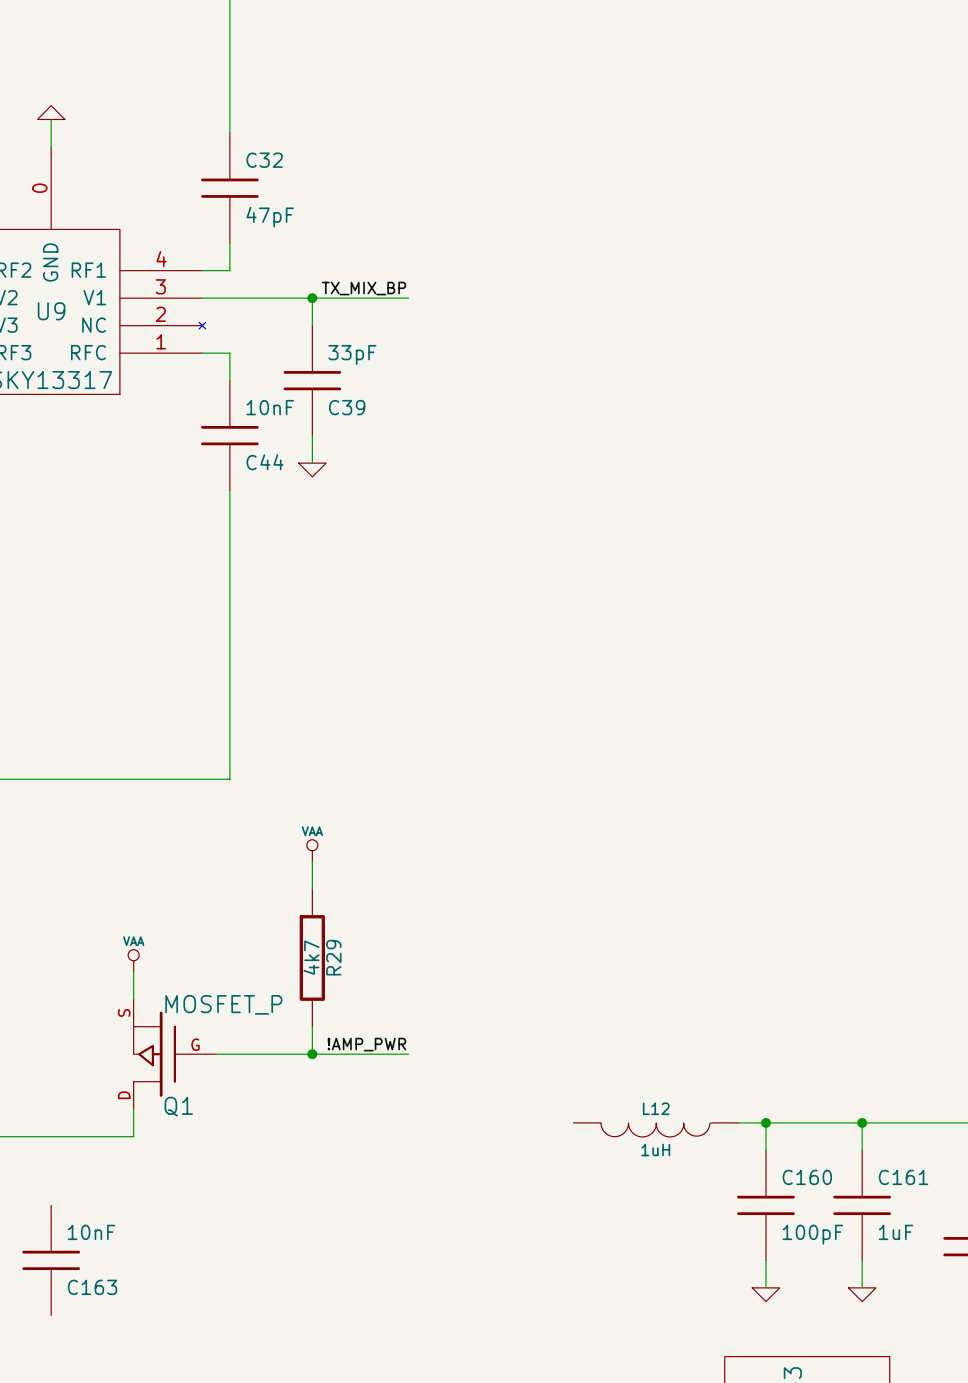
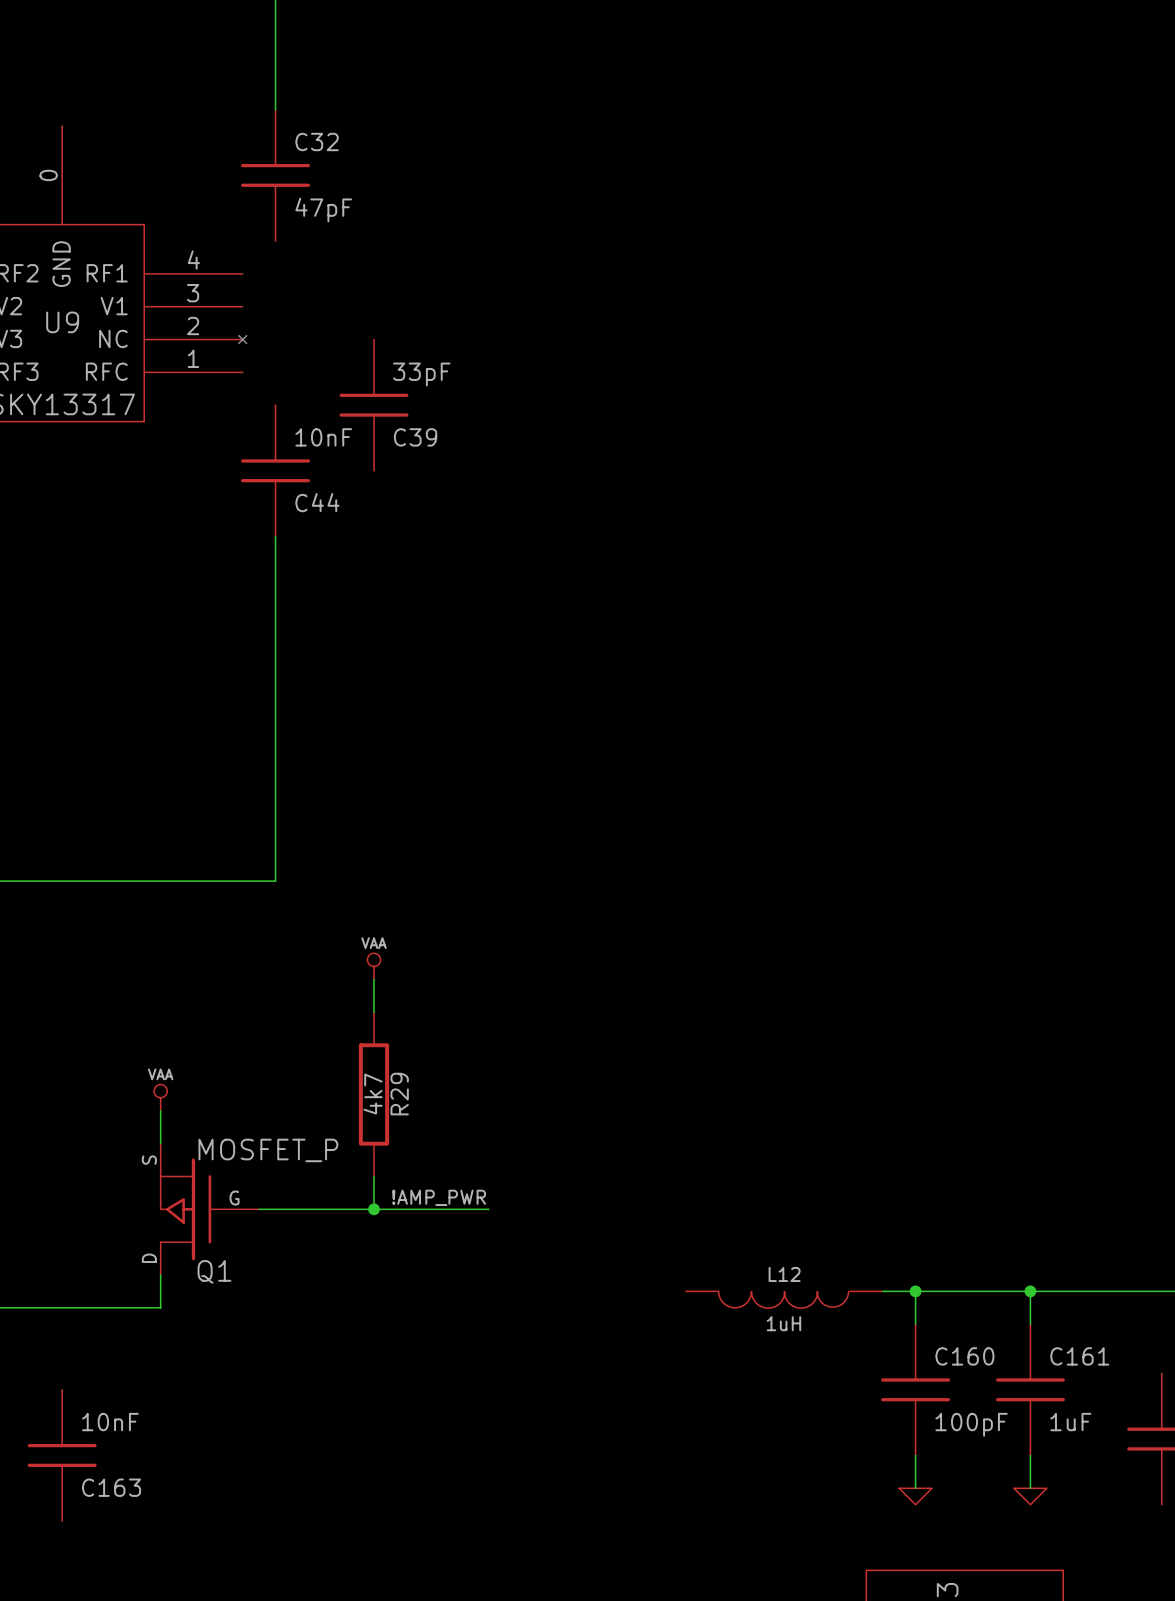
power symbol: (51, 112) -> none
wire: (51, 119) (51, 146) -> none
wire: (229, 243) (229, 270) (202, 270) -> none
label: TX_MIX_BP (364, 288) -> none
wire: (202, 298) (408, 298) -> none
wire: (312, 298) (312, 325) -> none
junction: (312, 298) -> none
wire: (202, 353) (229, 353) (229, 380) -> none
wire: (312, 435) (312, 463) -> none
power symbol: (312, 469) -> none

